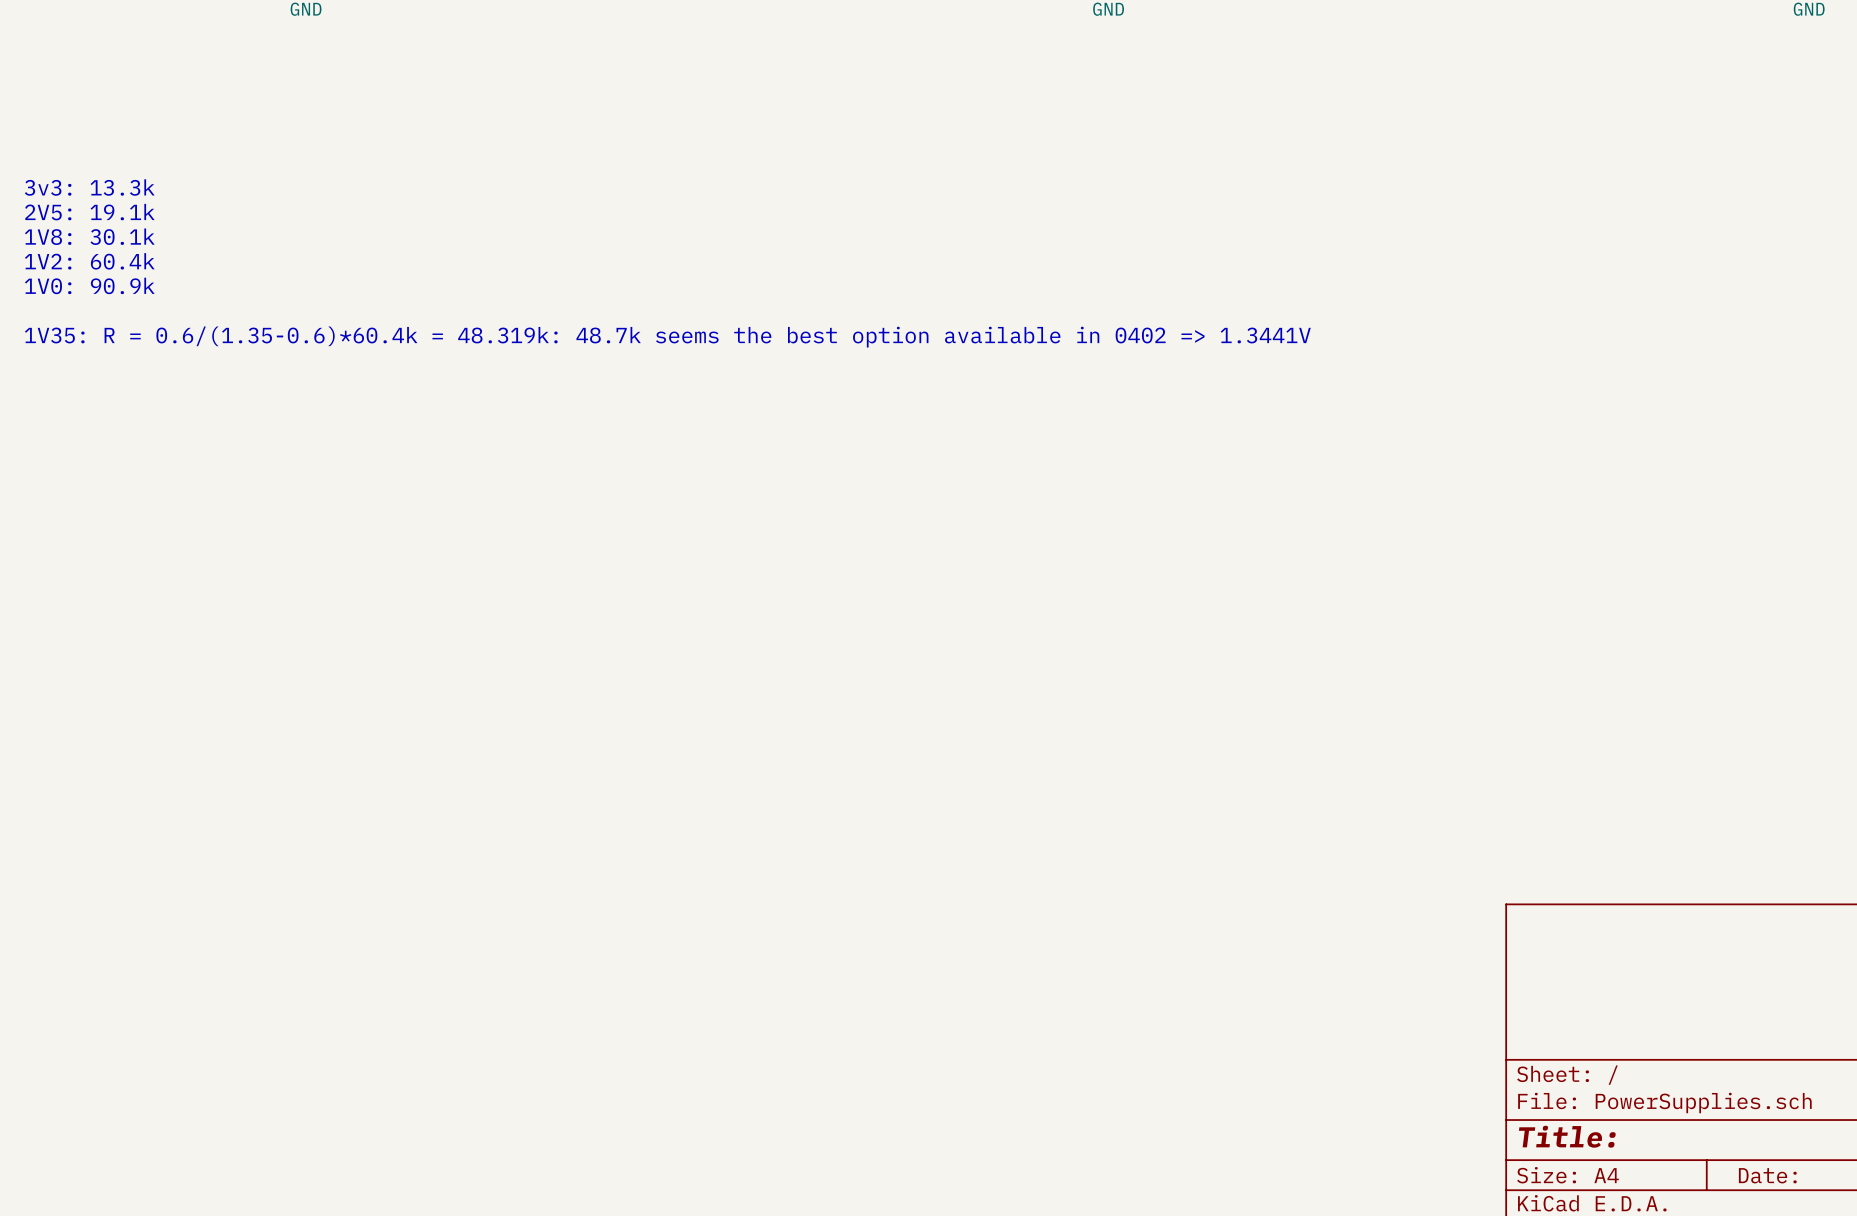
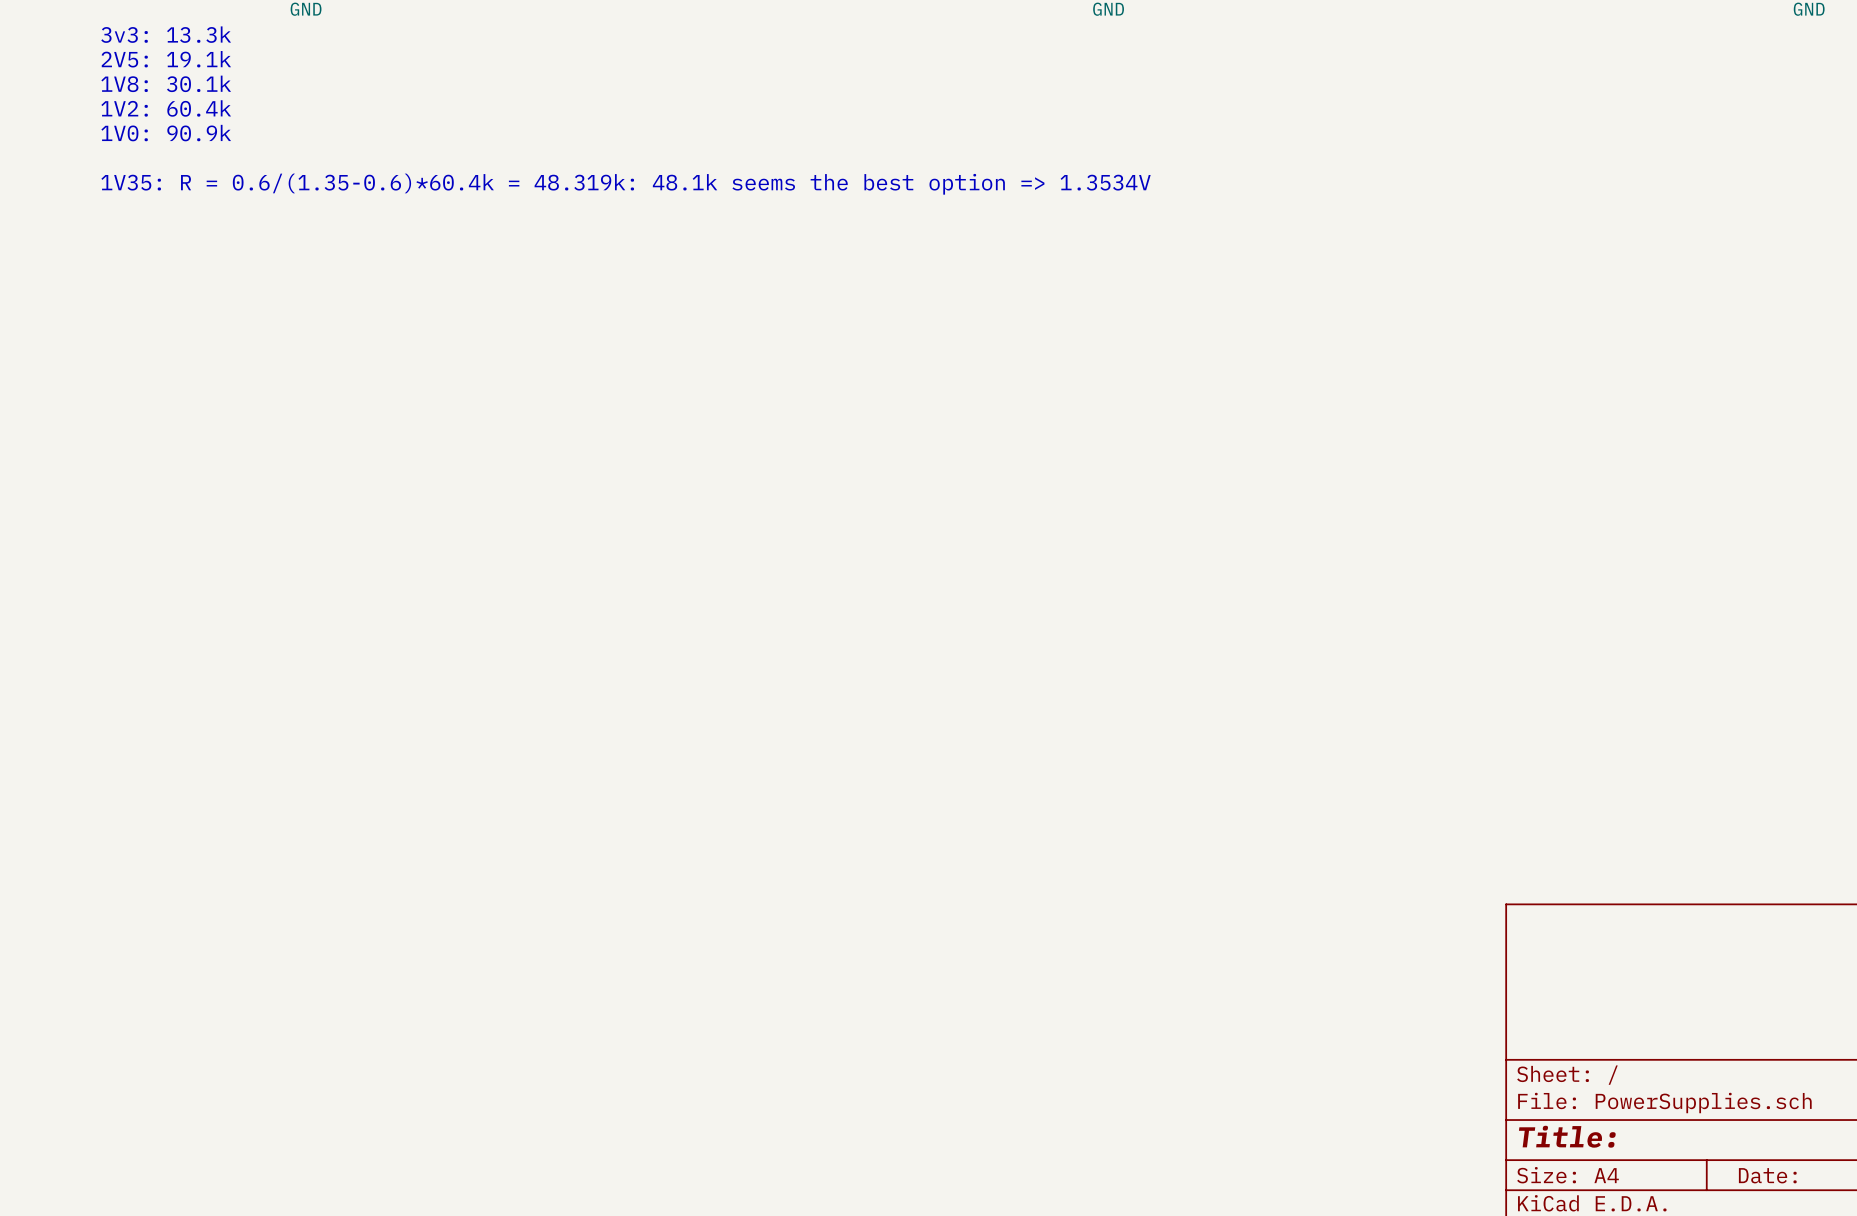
text: none -> 1V35: R = 0.6/(1.35-0.6)*60.4k = 48.319k: 48.1k seems the best option => 1.3534V (626, 184)
text position: 3v3: 13.3k (89, 187) -> 3v3: 13.3k (166, 34)
text position: 2V5: 19.1k (89, 212) -> 2V5: 19.1k (166, 59)
text position: 1V8: 30.1k (89, 236) -> 1V8: 30.1k (166, 83)
text position: 1V2: 60.4k (89, 261) -> 1V2: 60.4k (166, 108)
text position: 1V0: 90.9k (89, 285) -> 1V0: 90.9k (166, 133)
text: 1V35: R = 0.6/(1.35-0.6)*60.4k = 48.319k: 48.7k seems the best option available in 0402 => 1.3441V (667, 337) -> none

